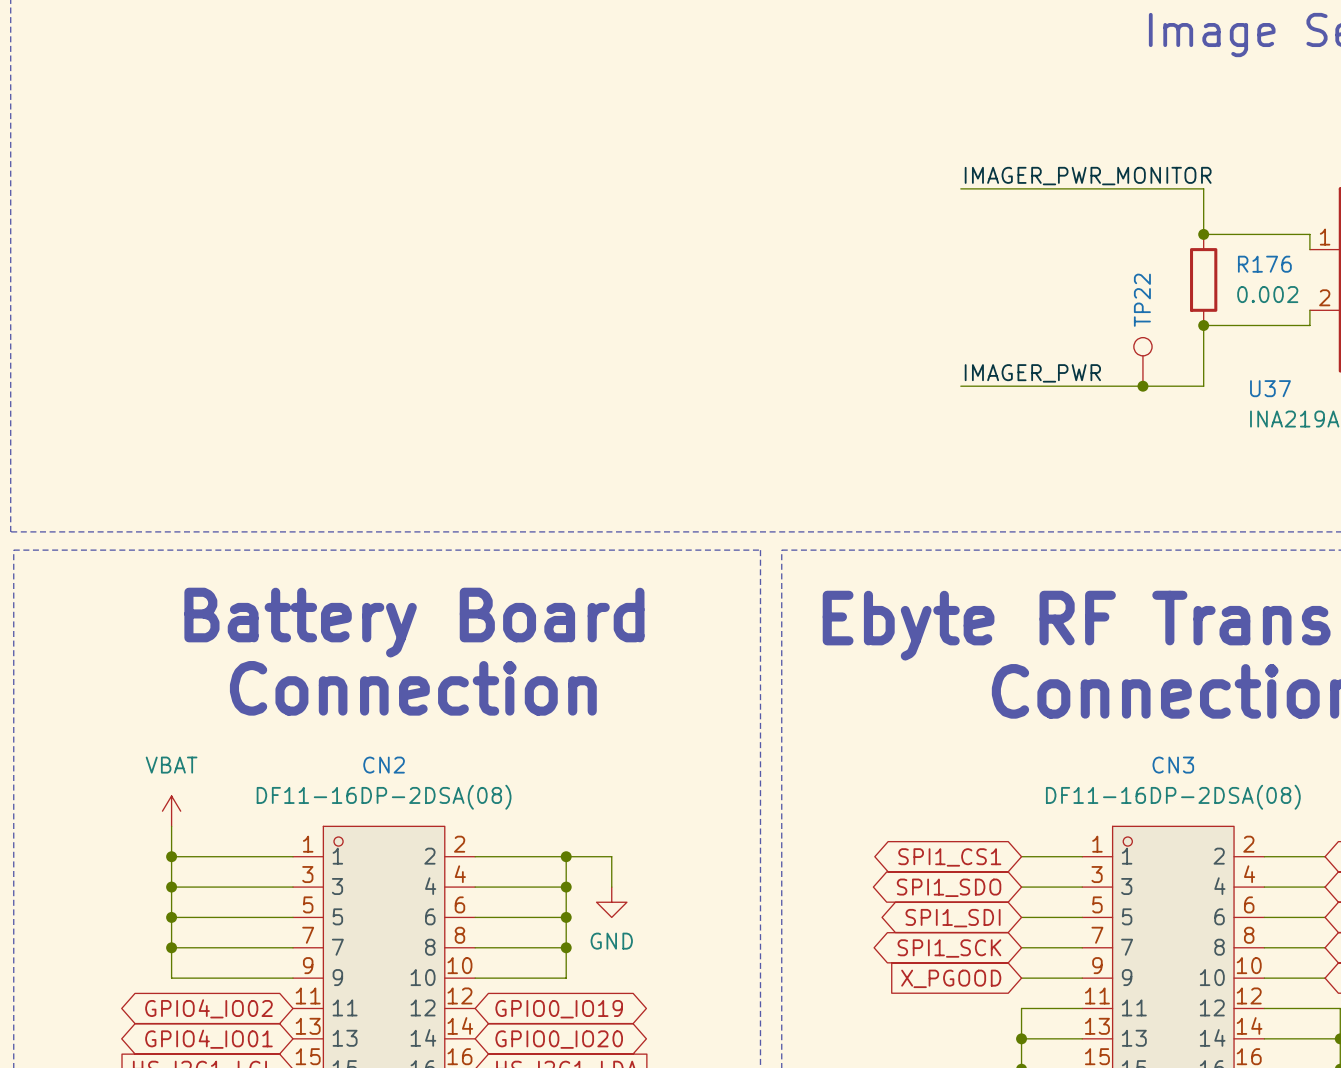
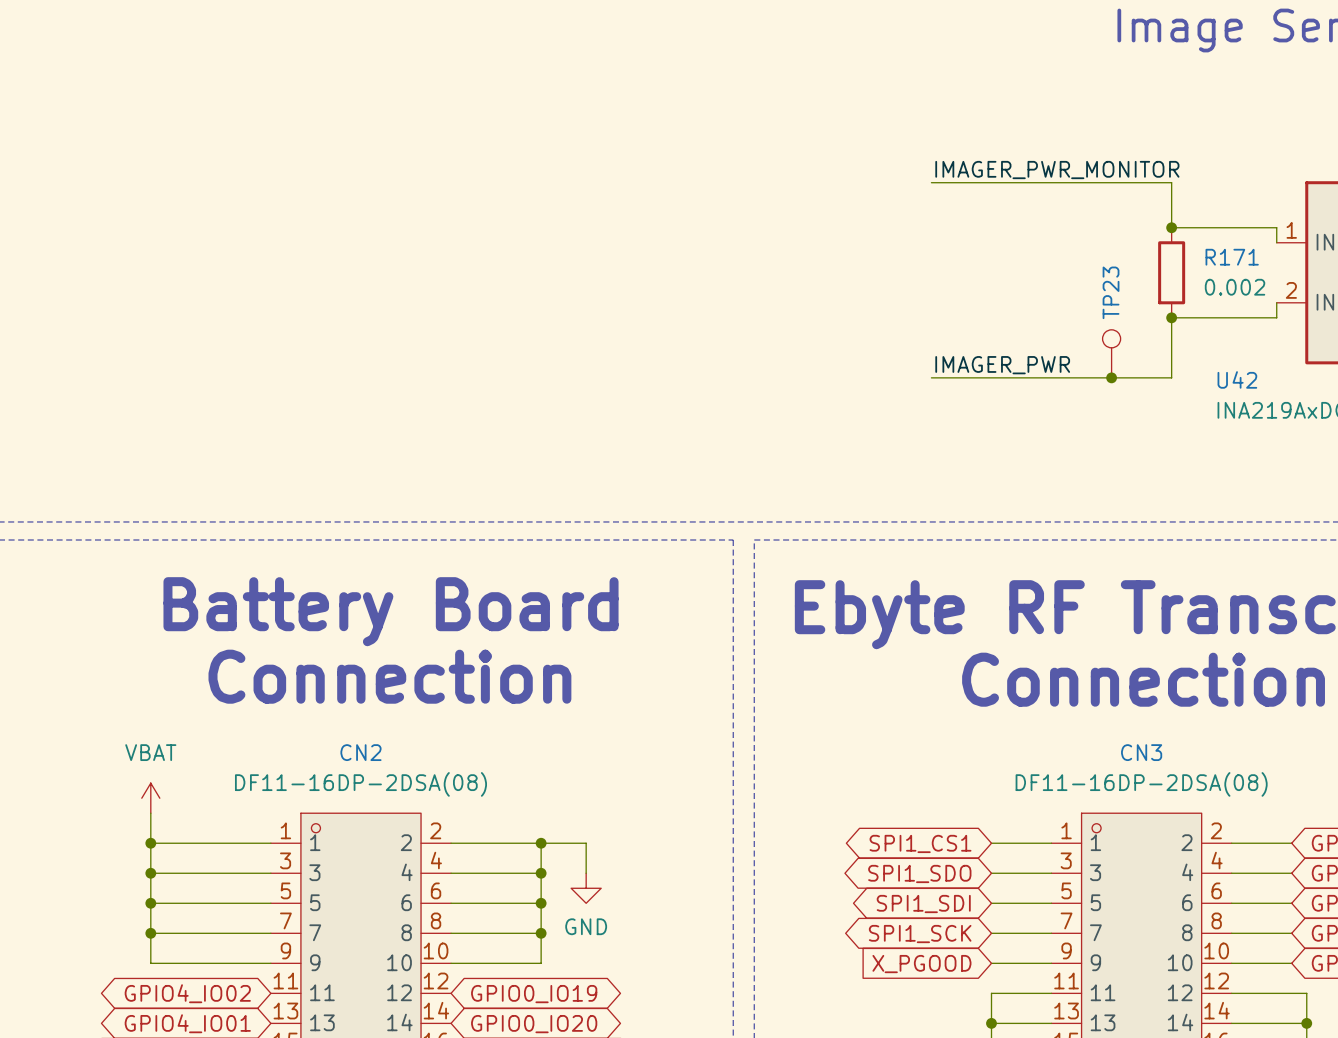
R176 name: R176 (1264, 264) -> R171 (1232, 257)
TP22 name: TP22 (1142, 300) -> TP23 (1111, 292)
U37 name: U37 (1270, 388) -> U42 (1237, 379)

